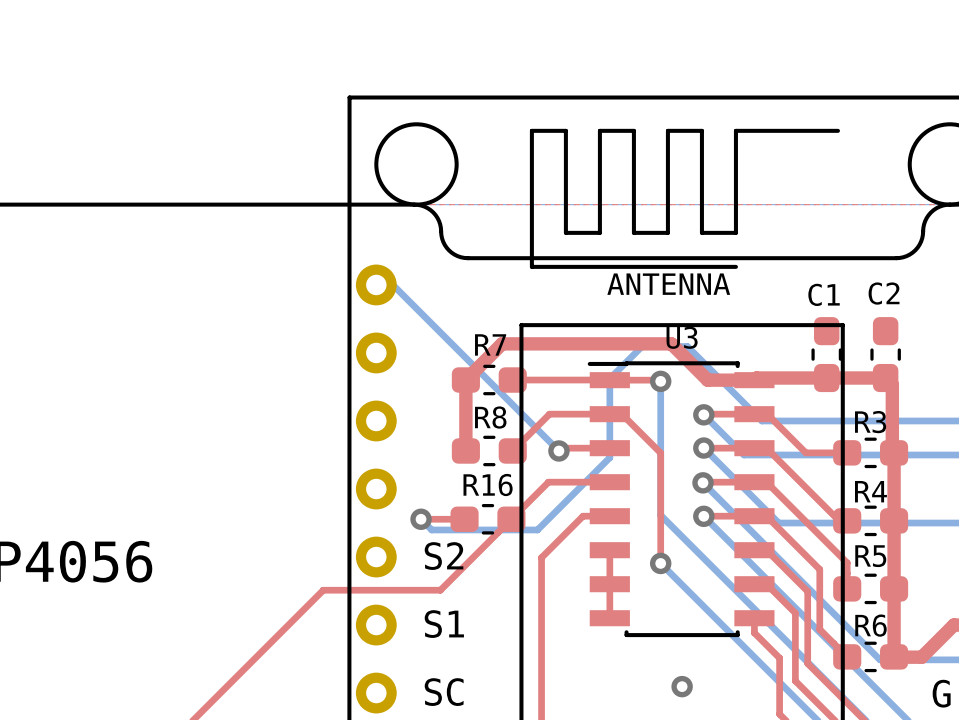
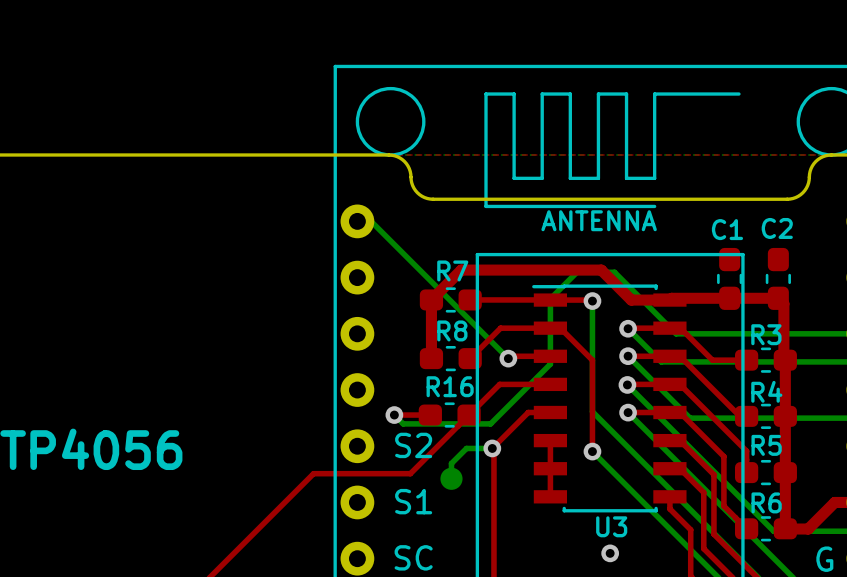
U3 name position: U3 (682, 337) -> U3 (611, 526)
bottom track: none -> (492, 448) (466, 448) (451, 463) (451, 478)
via: none -> (492, 448)
part: none -> (451, 478)

